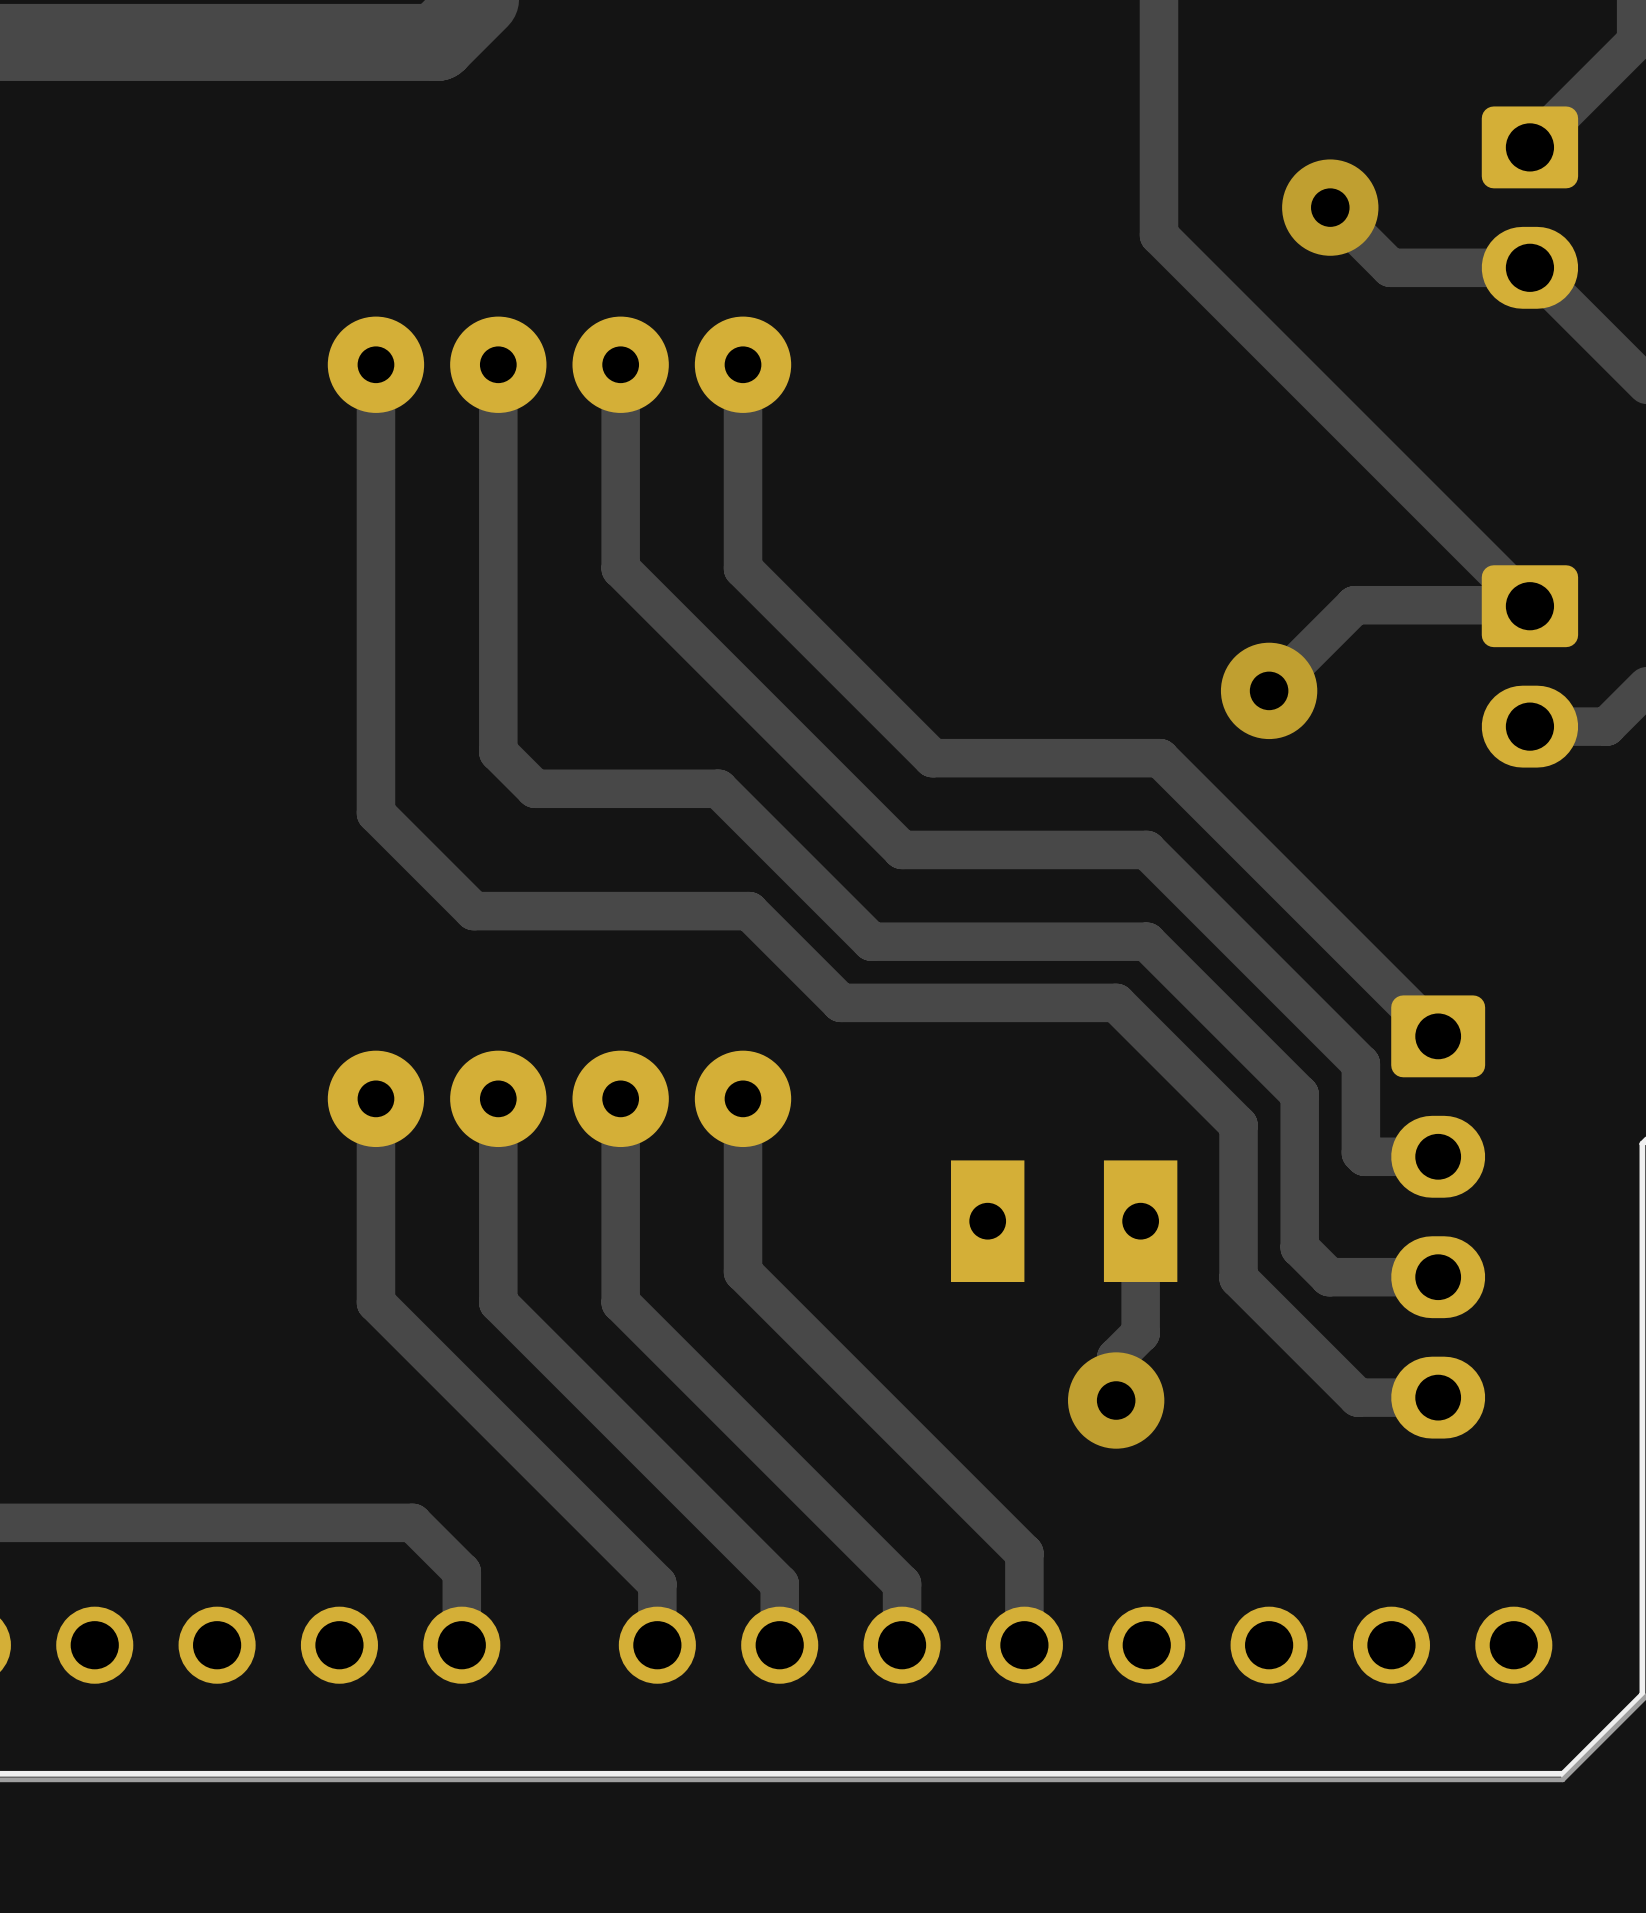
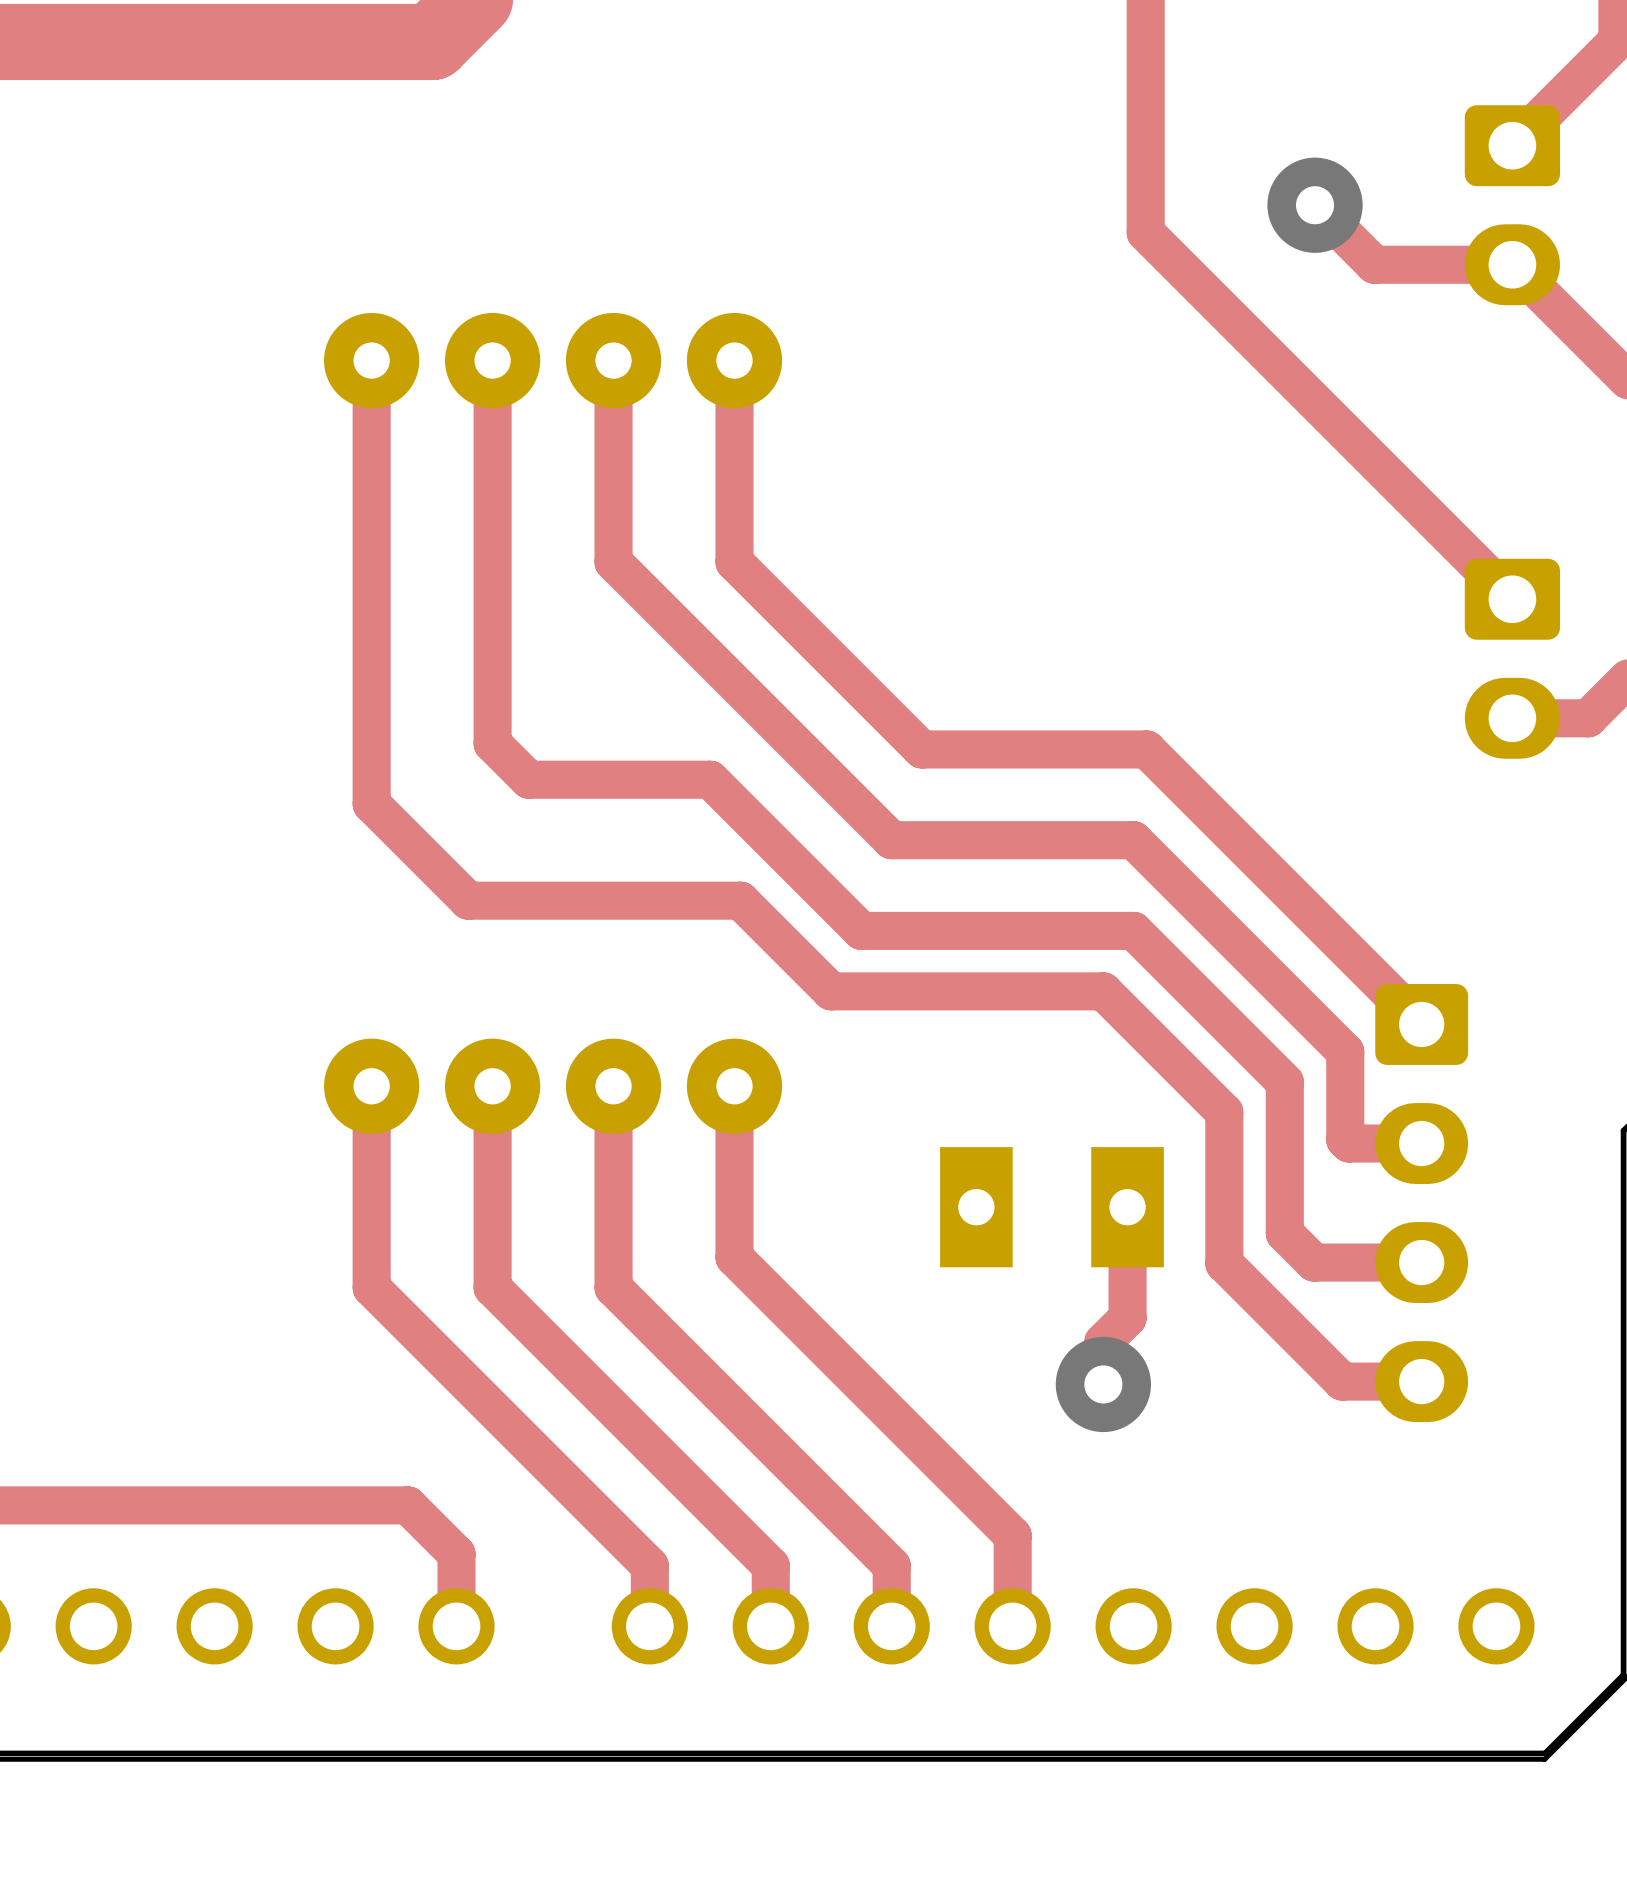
track: (1528, 605) (1354, 605) (1269, 690) -> none
via: (1269, 690) -> none

